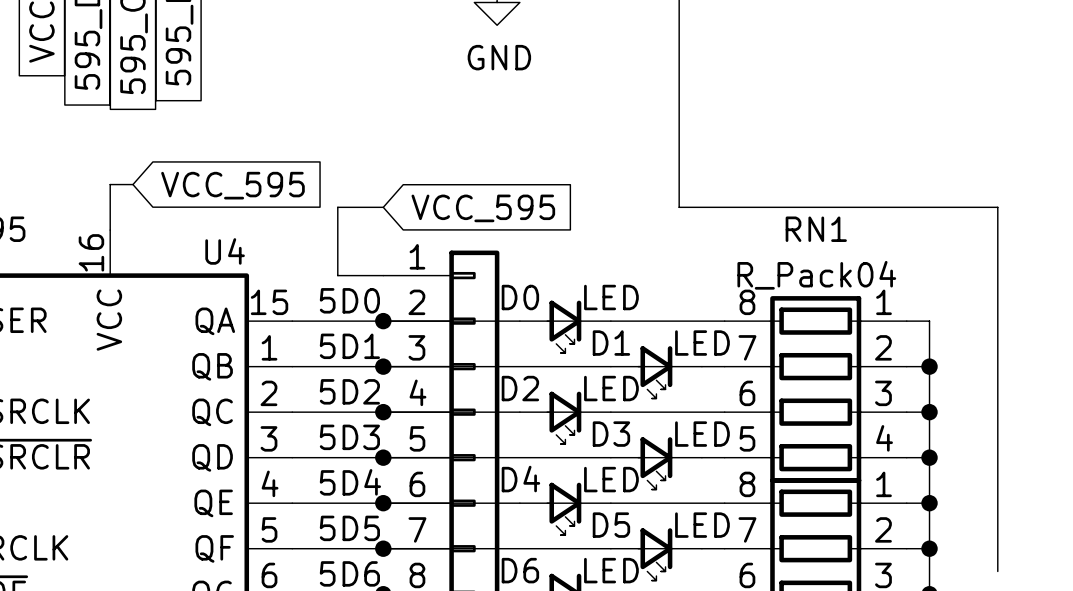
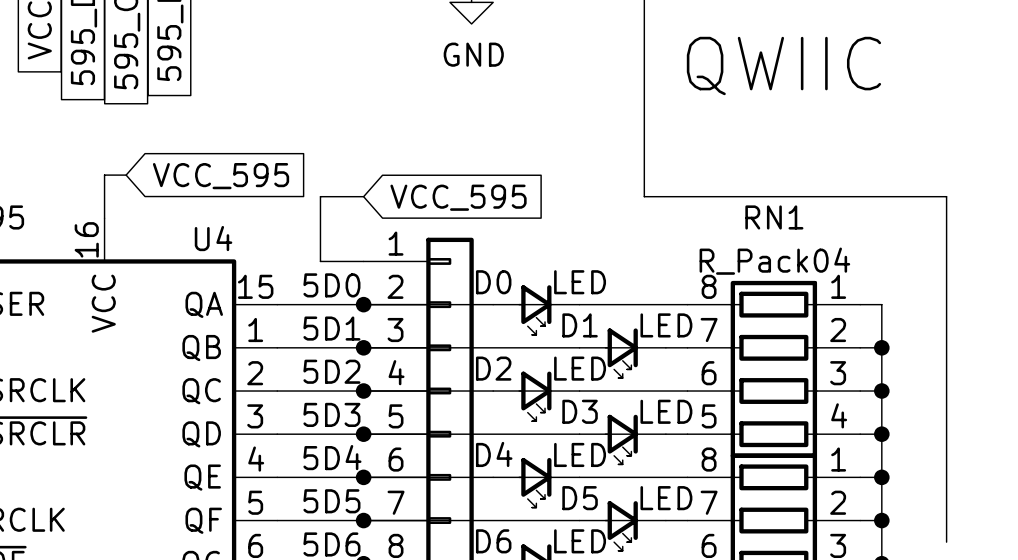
text: none -> QWIIC (783, 65)

